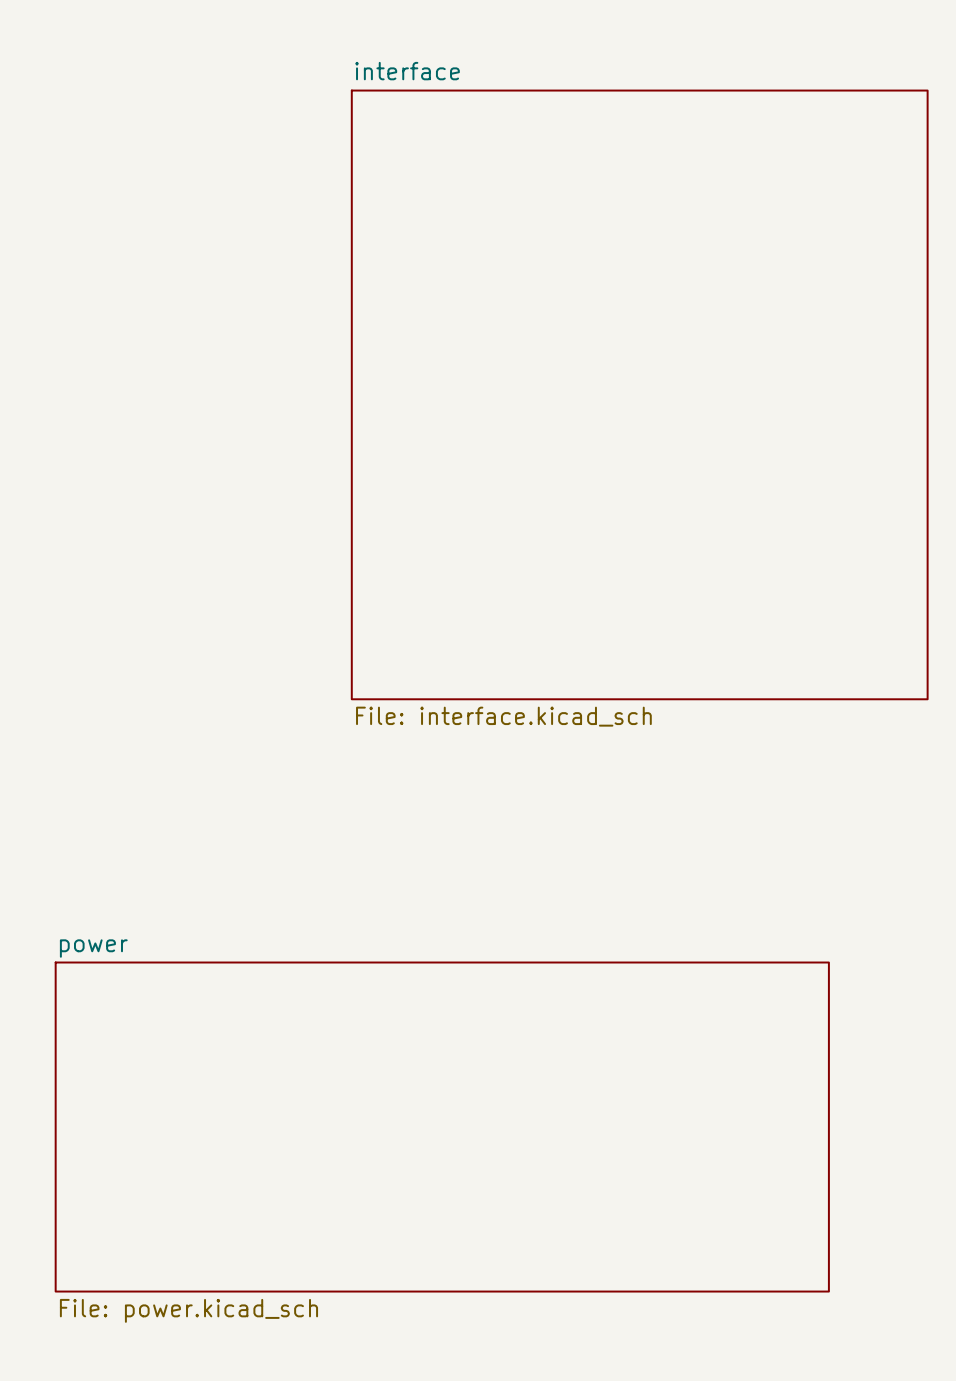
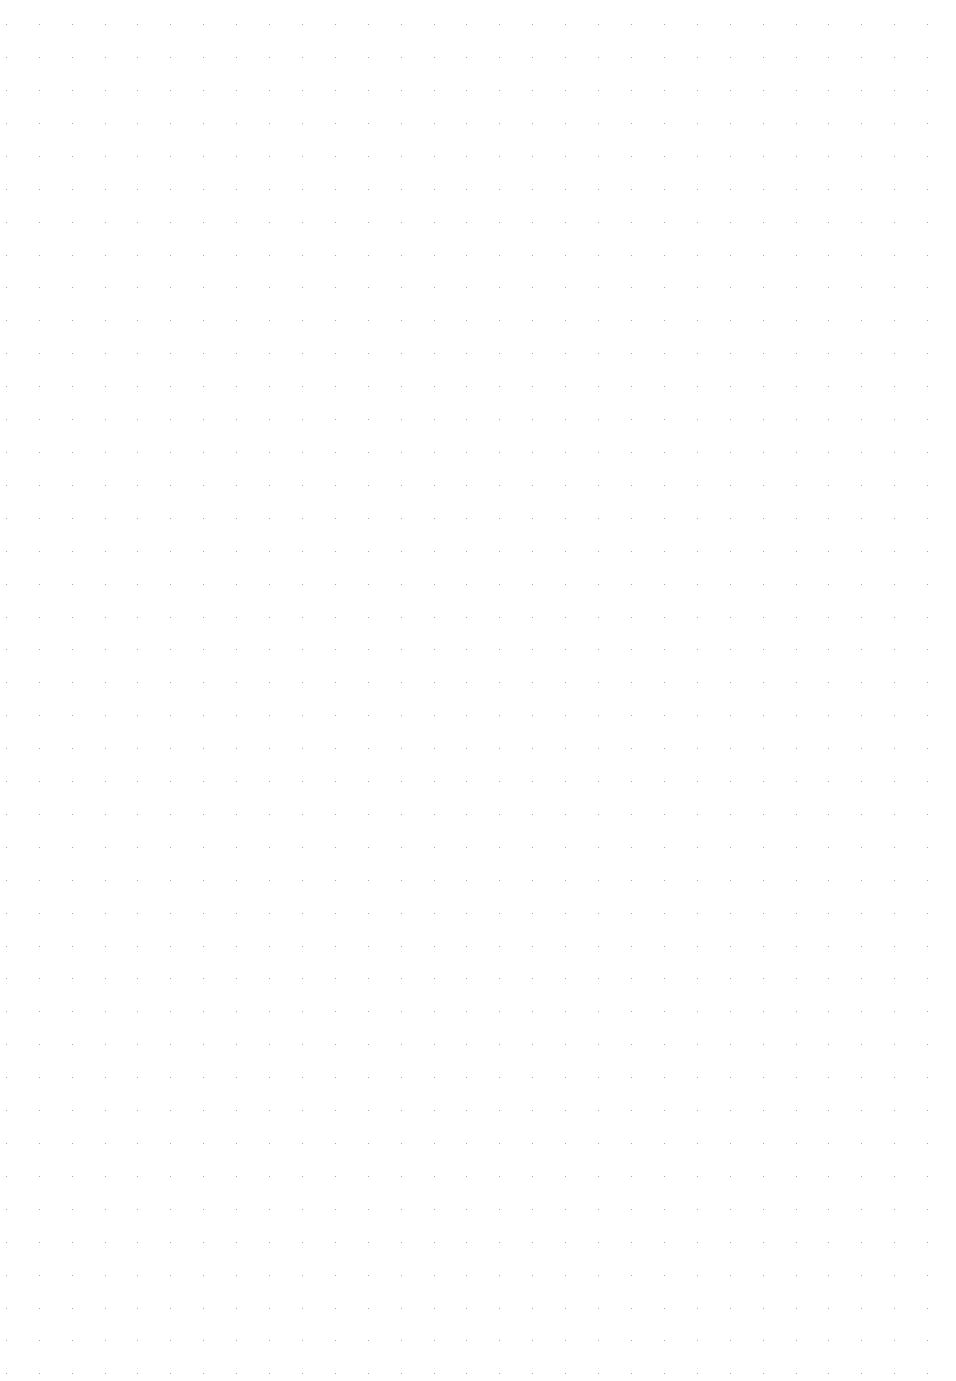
sheet interface: File: interface.kicad_sch (639, 394) -> none
sheet power: File: power.kicad_sch (442, 1127) -> none

